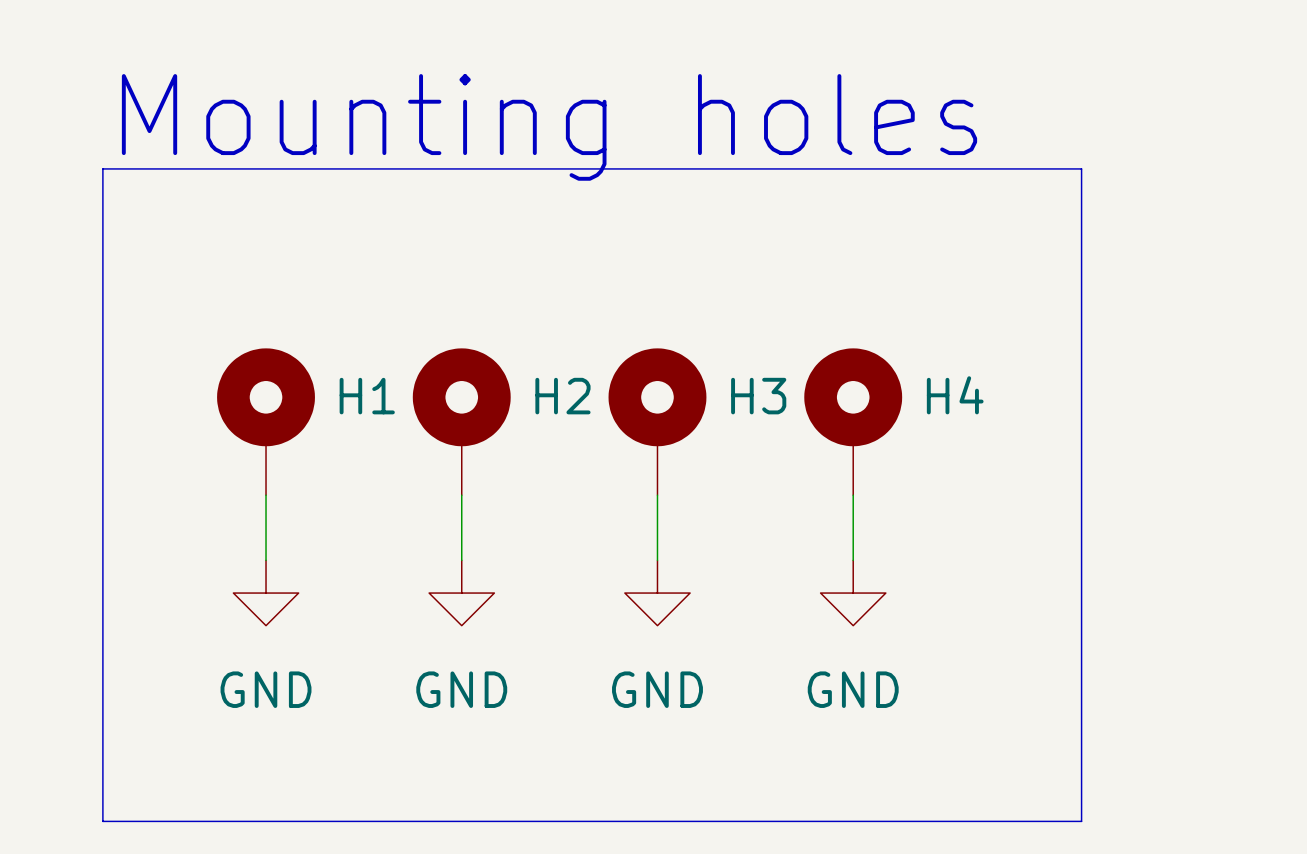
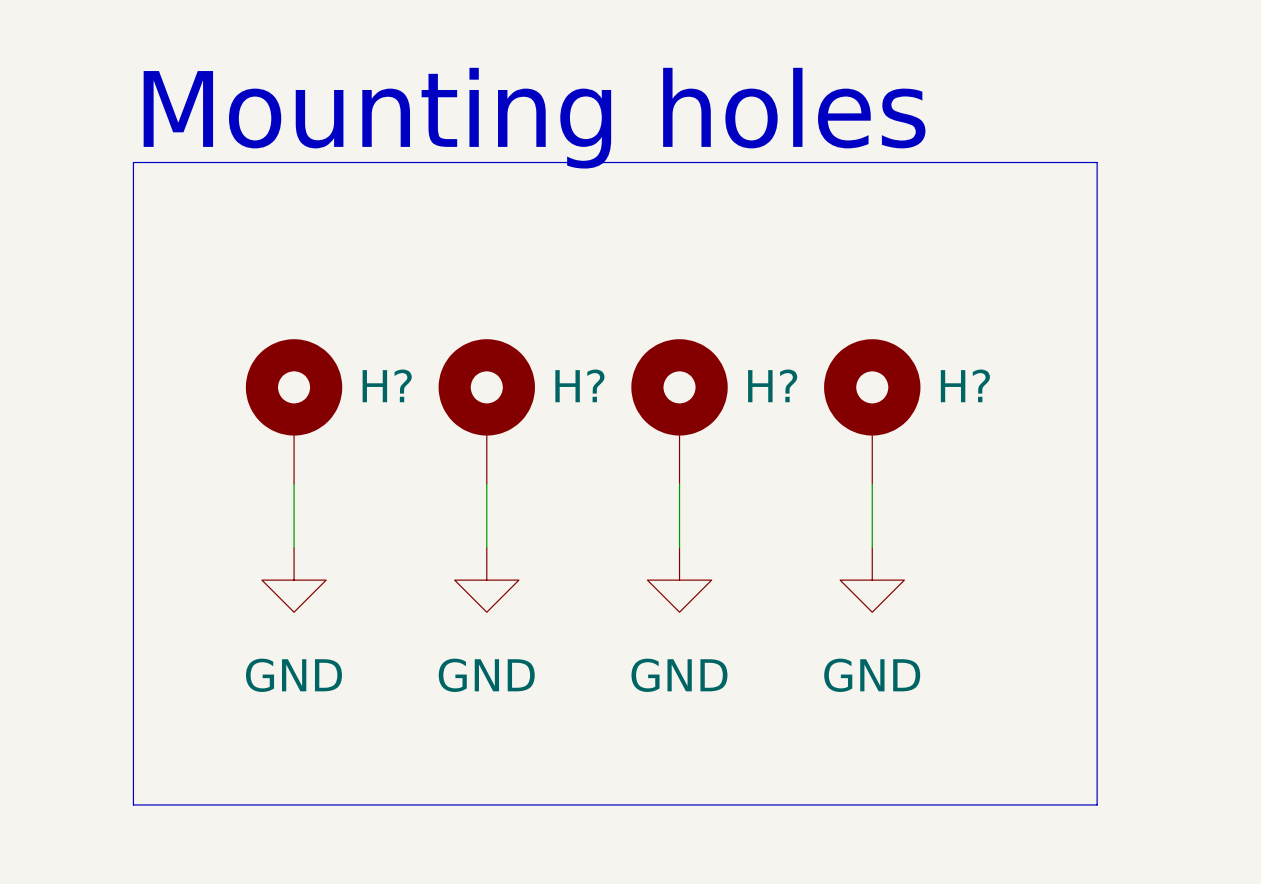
H4 name: H4 (955, 395) -> H? (965, 385)
H1 name: H1 (367, 396) -> H? (387, 385)
H2 name: H2 (562, 396) -> H? (579, 385)
H3 name: H3 (758, 396) -> H? (772, 385)

